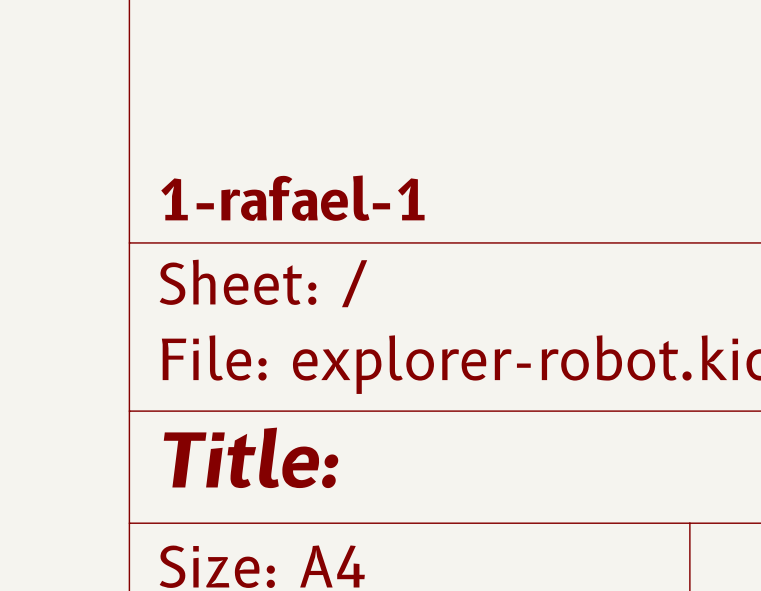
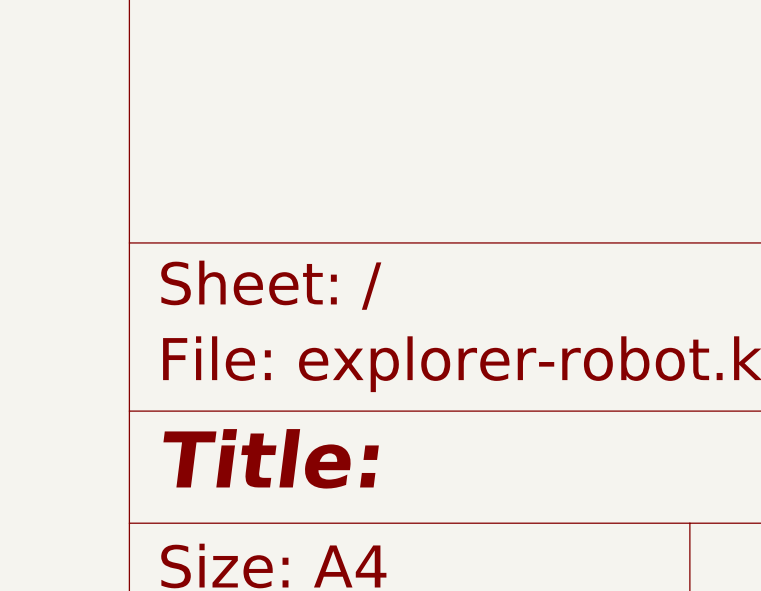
title block: 1-rafael-1 (292, 198) -> none

